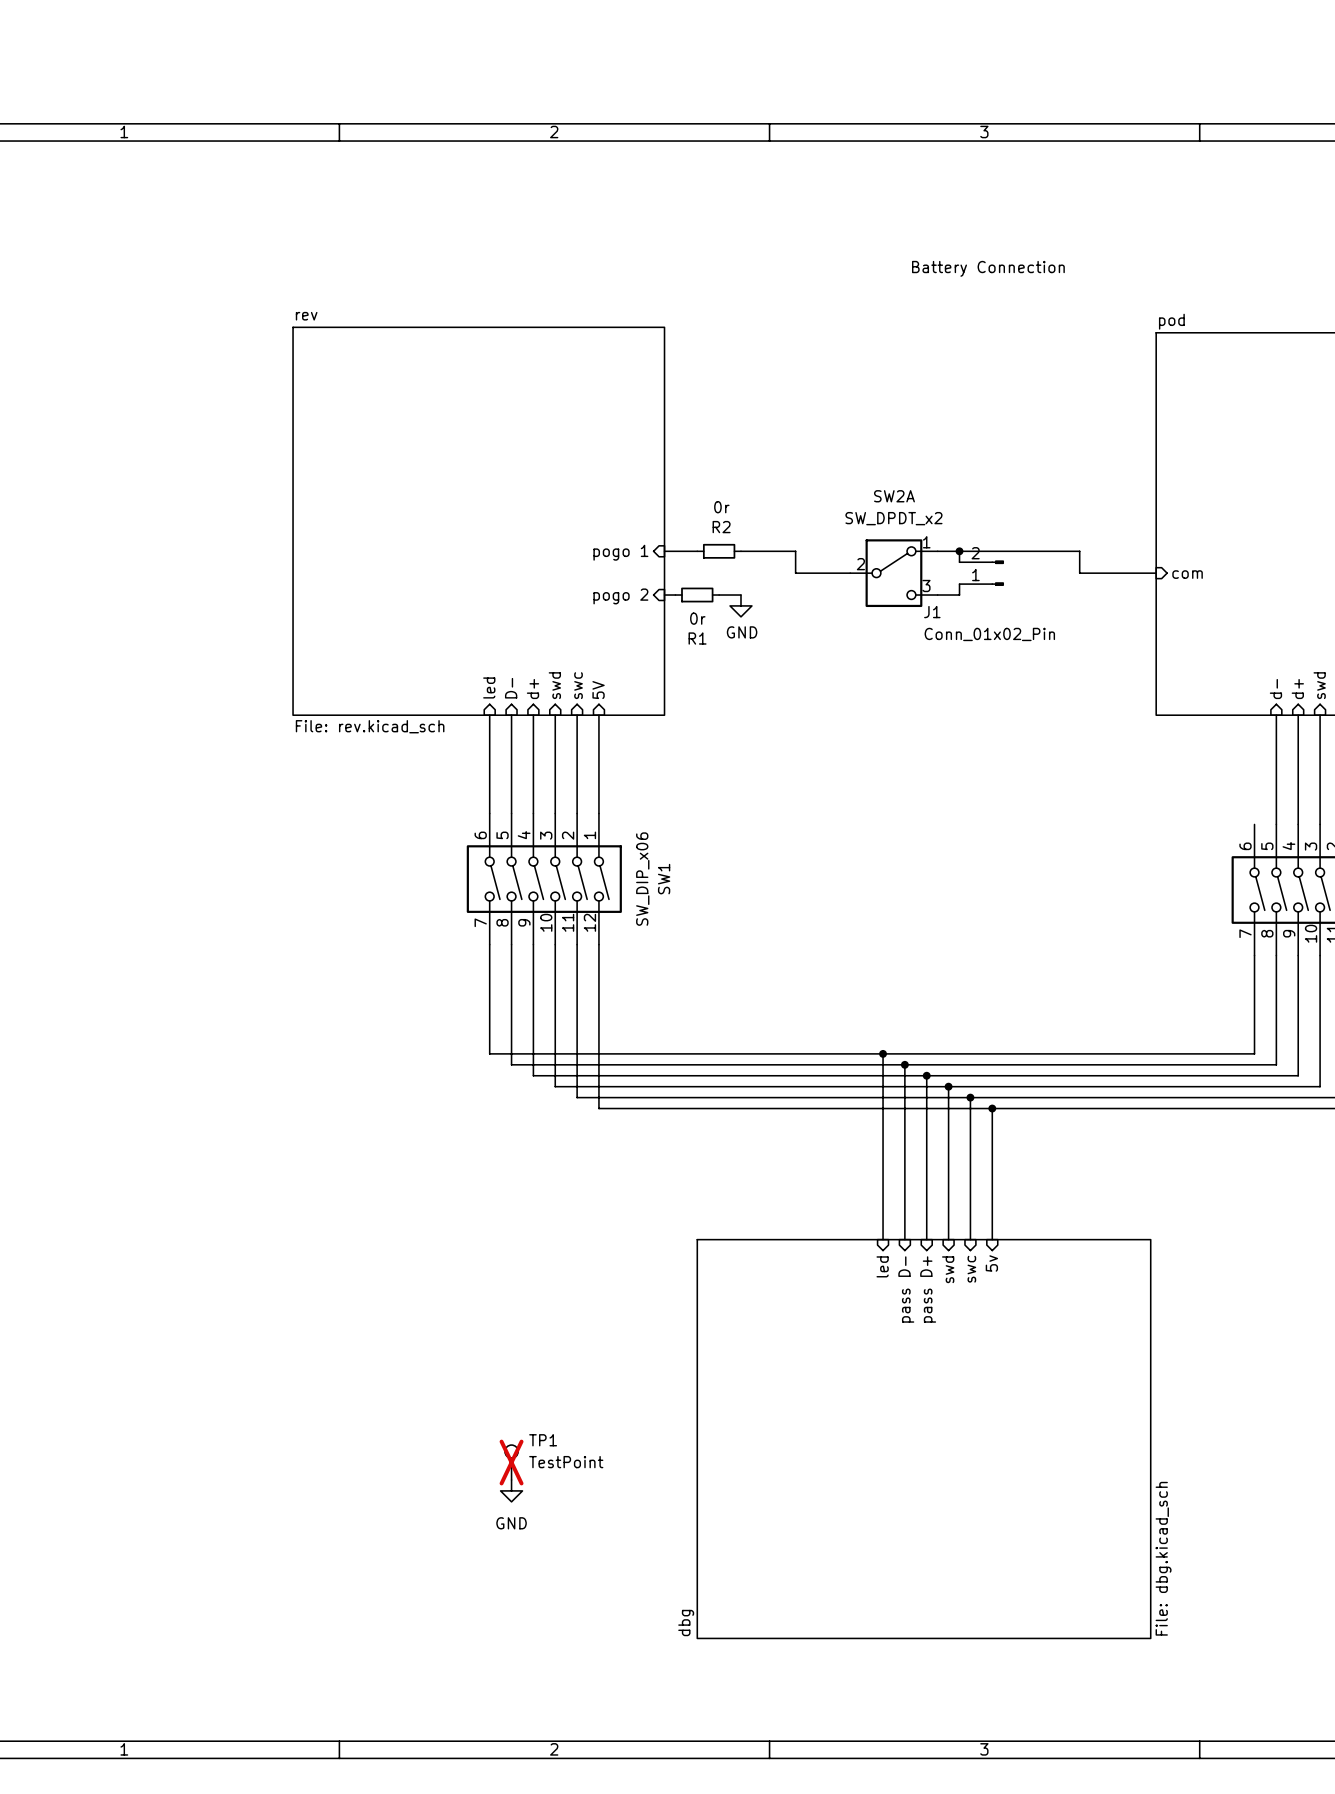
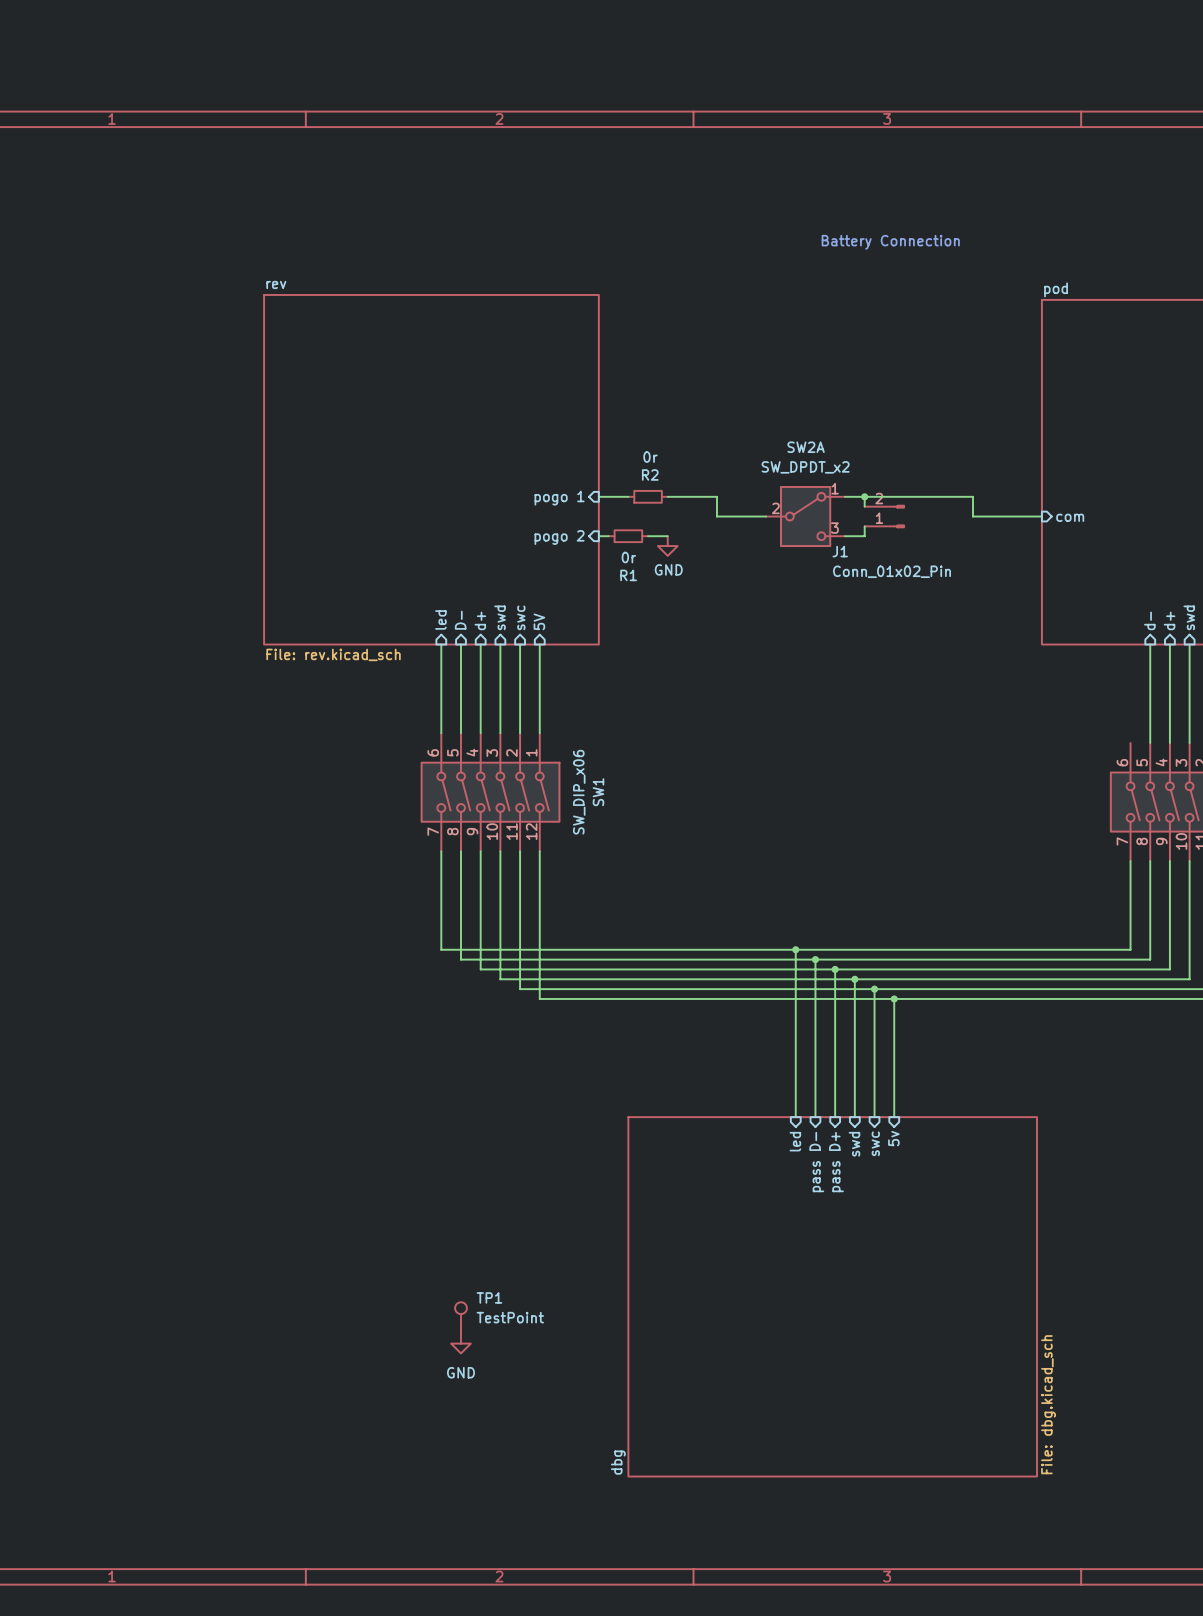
TP1 do-not-place cross: (511, 1462) -> none

